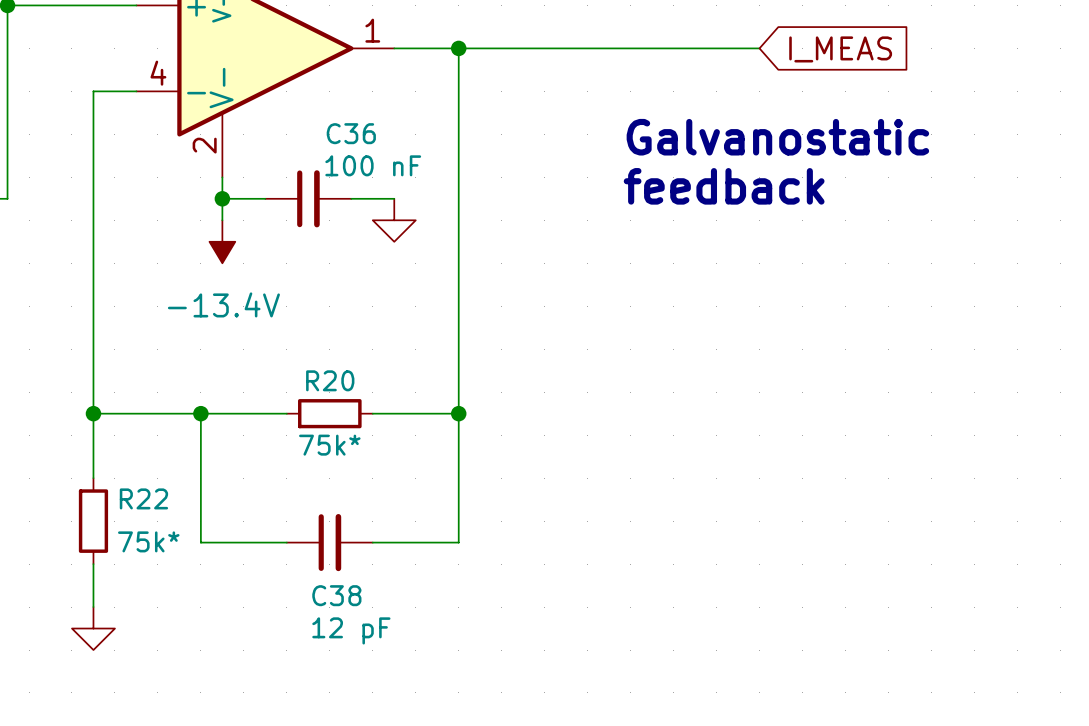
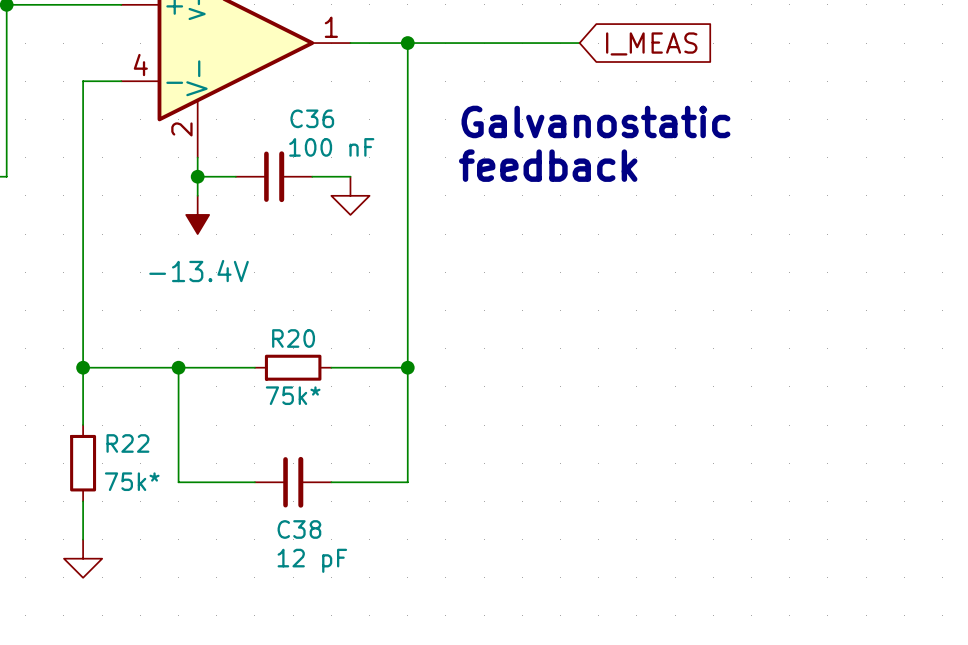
wire: (652, 48) (759, 48) -> none
global label position: I_MEAS (840, 49) -> I_MEAS (651, 43)
text position: Galvanostatic (777, 137) -> Galvanostatic (595, 121)
text position: feedback (724, 186) -> feedback (548, 165)

